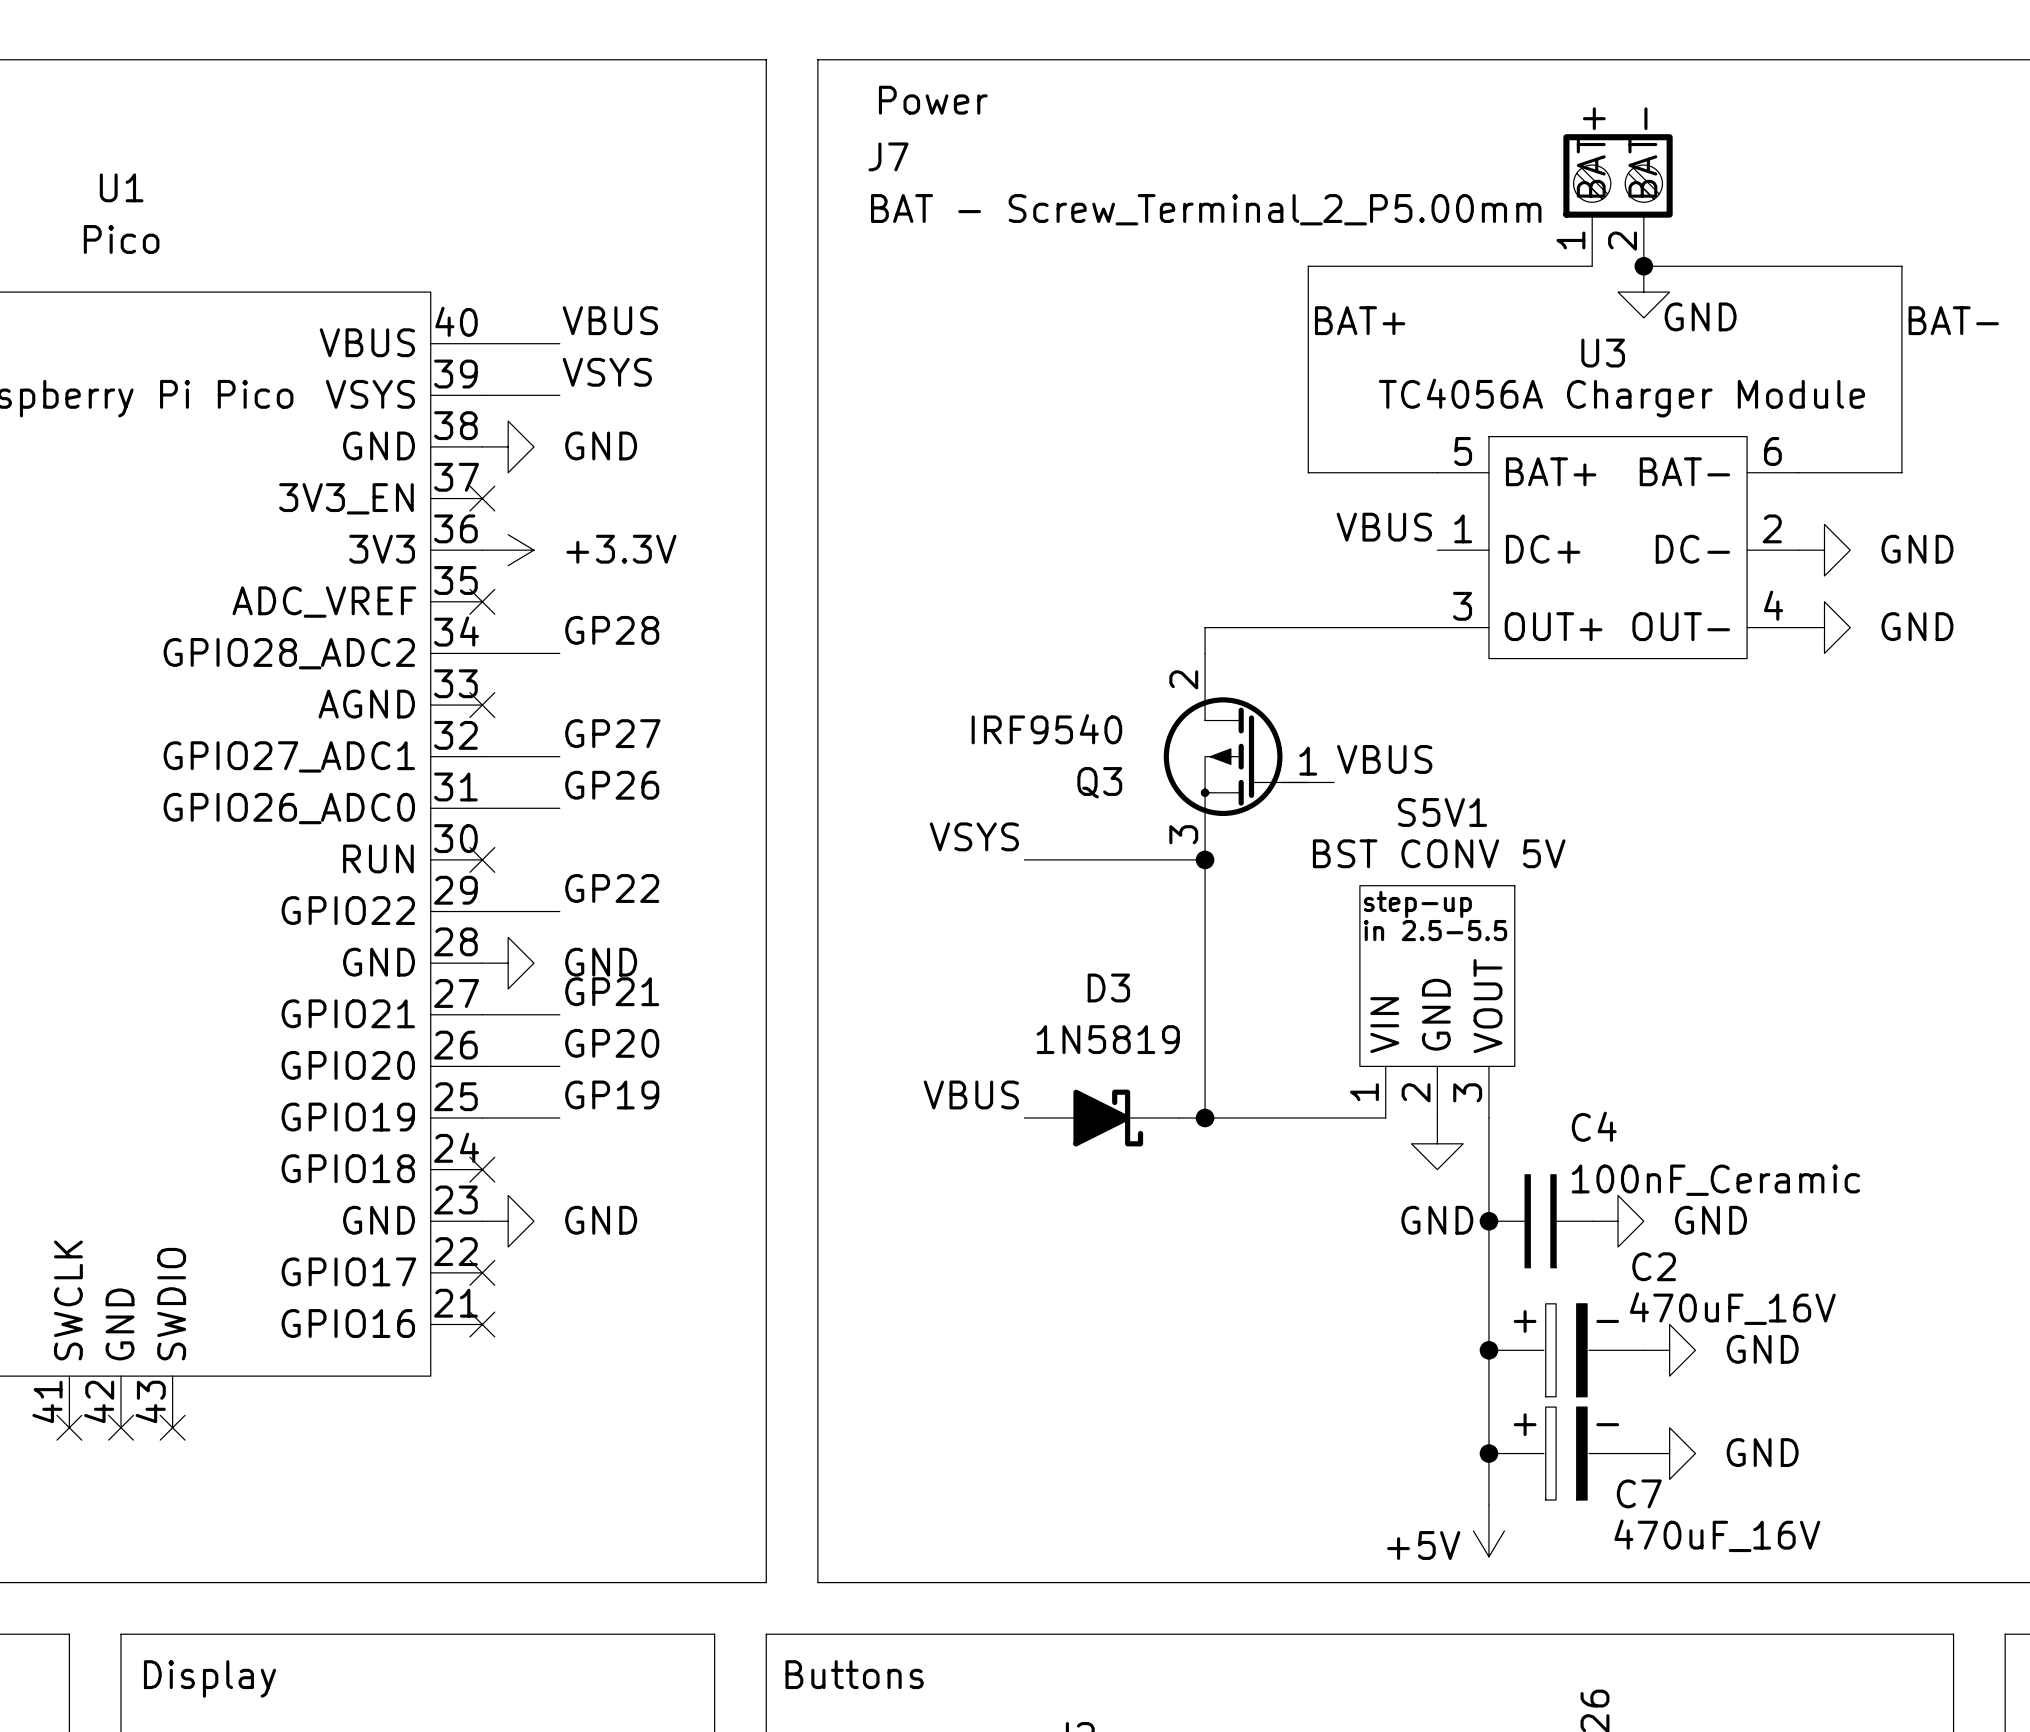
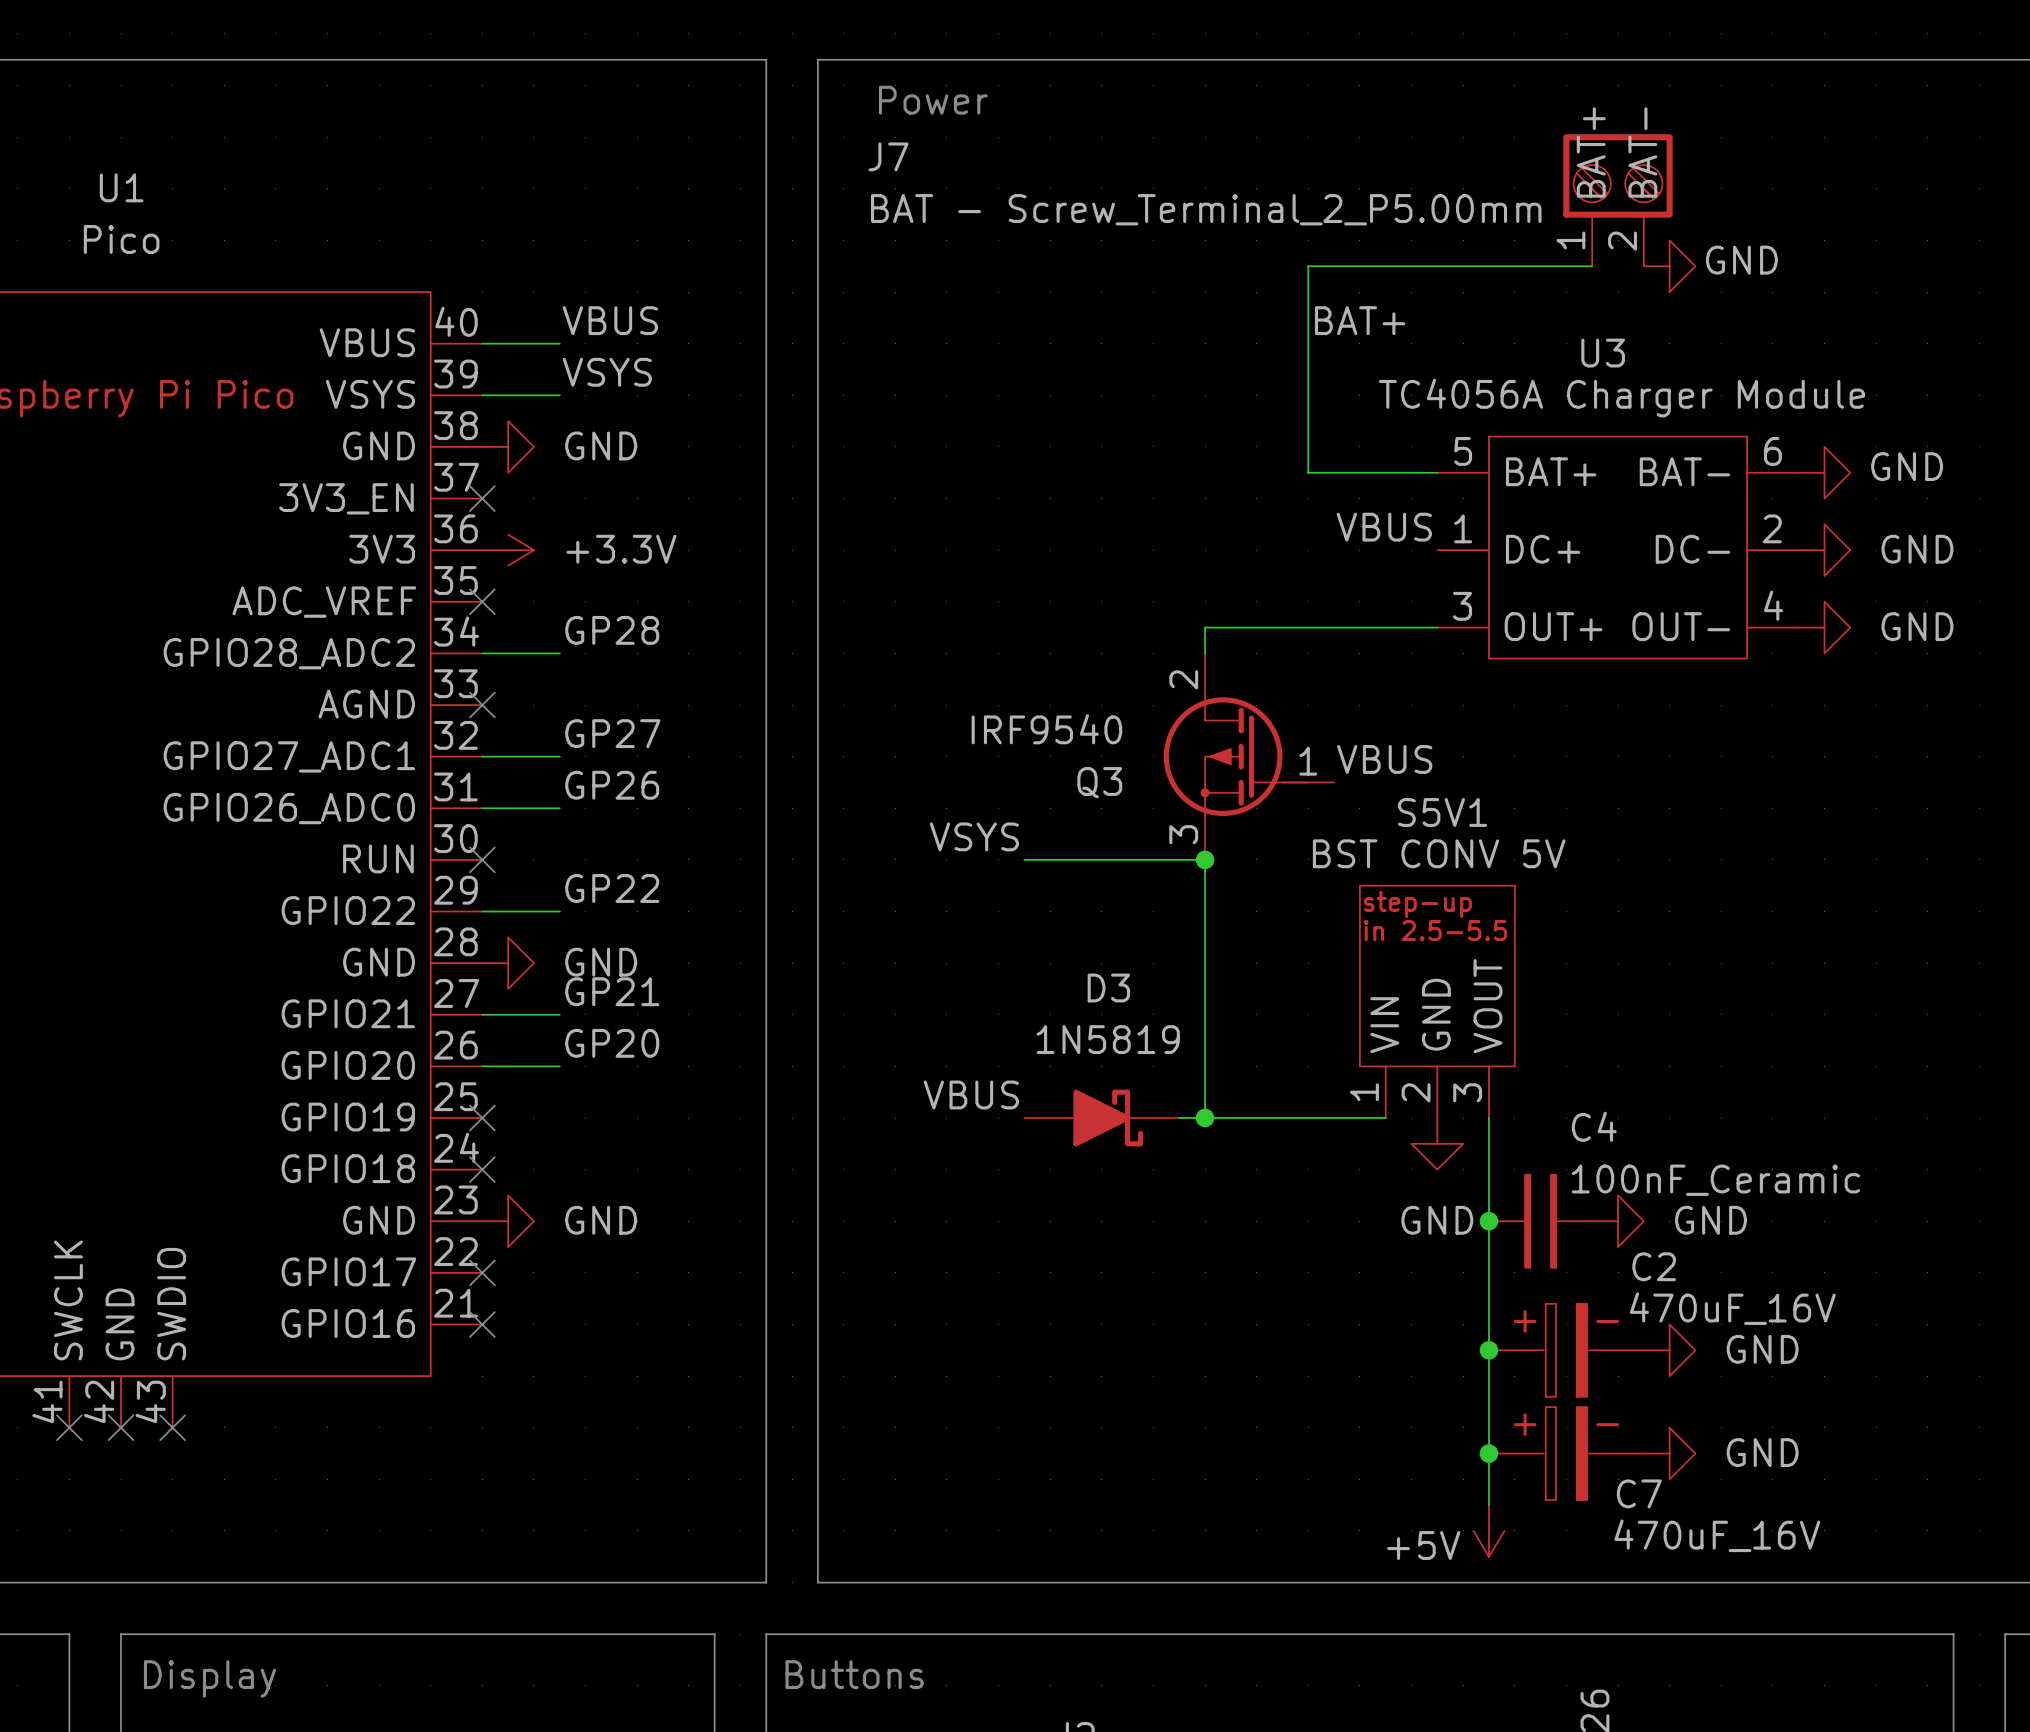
wire: (1643, 266) (1901, 266) (1901, 472) (1798, 472) -> none
junction: (1643, 266) -> none
power symbol rotation: 0° (1643, 292) -> 90° counterclockwise (1669, 266)
power symbol position: GND (1643, 292) -> GND (1669, 266)
label: BAT- (1953, 320) -> none
power symbol: none -> GND (1824, 472)
label: GP19 (612, 1094) -> none
wire: (482, 1118) (559, 1118) -> none
no-connect mark: none -> (482, 1118)

